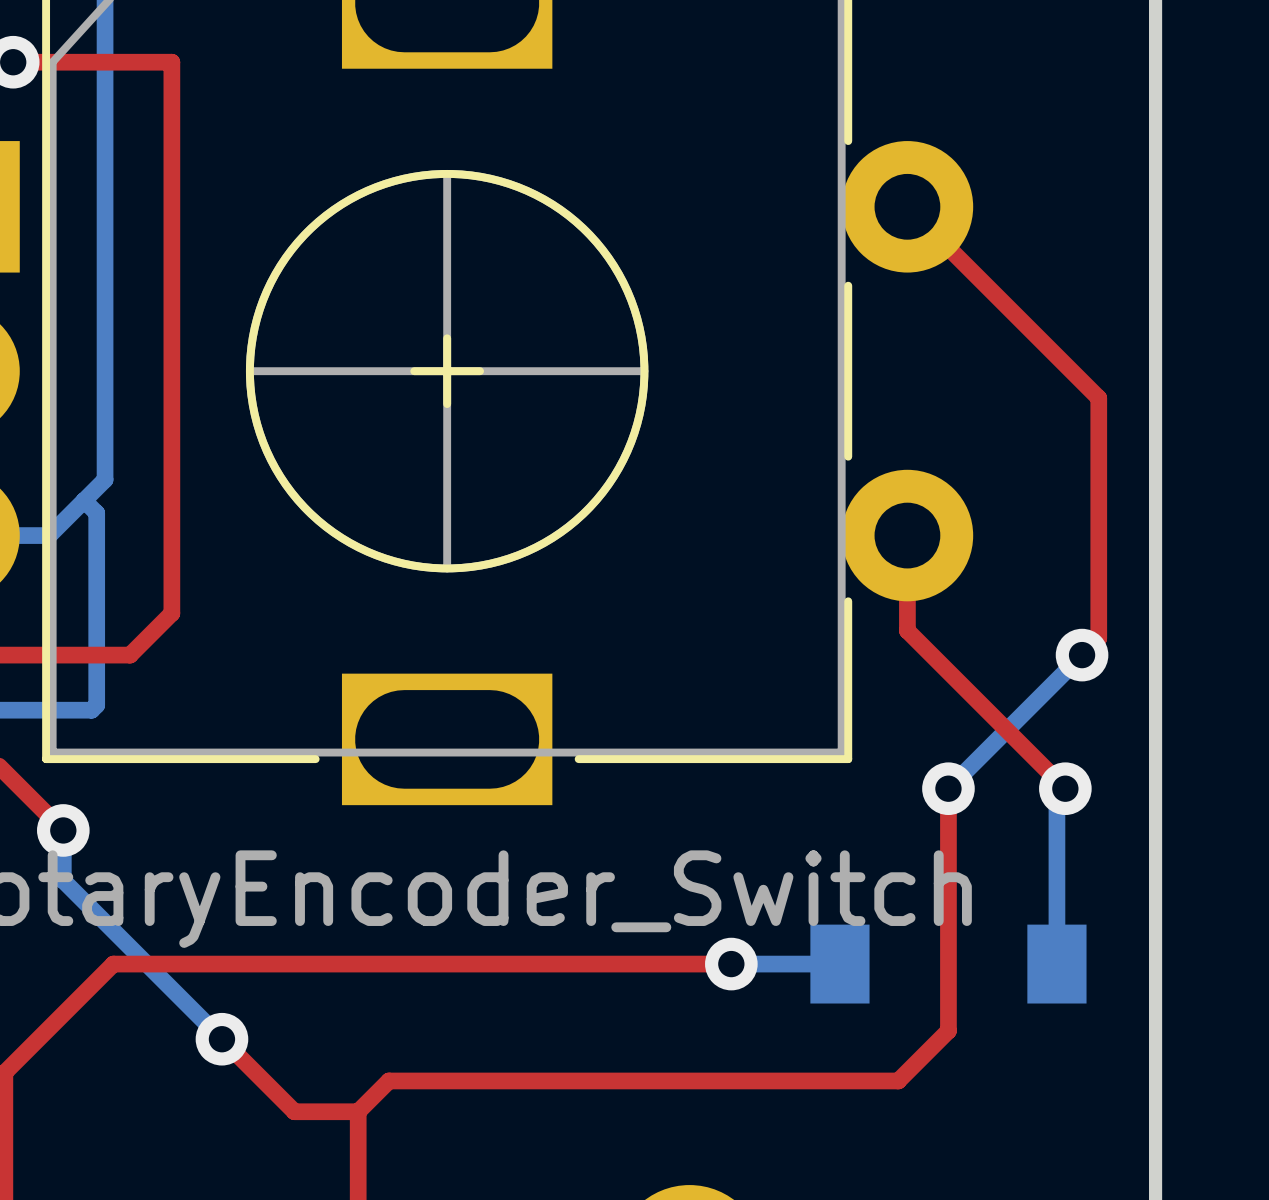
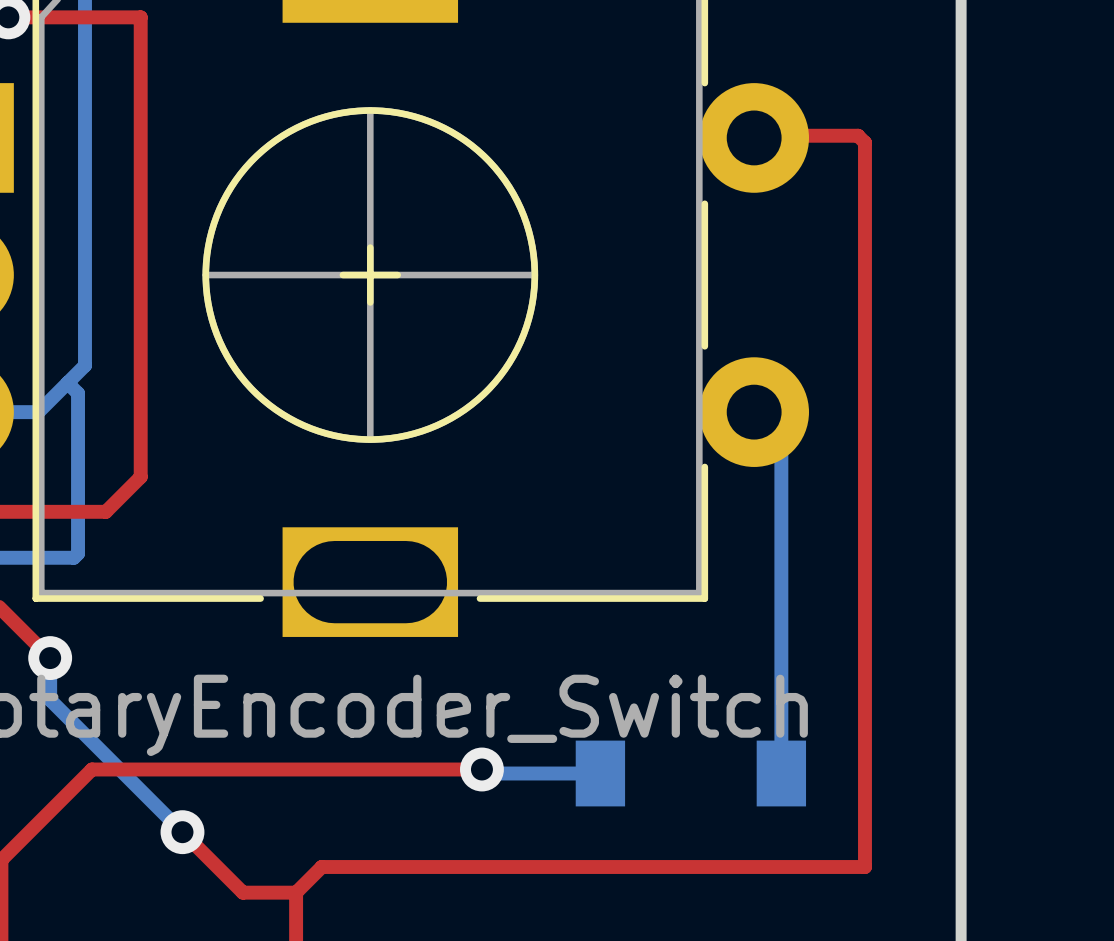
top track: (907, 206) (1098, 398) (1098, 638) (1082, 655) -> (754, 137) (756, 135) (858, 135) (864, 142) (864, 867) (746, 867)
bottom track: none -> (754, 412) (781, 439) (781, 773)
top track: (907, 535) (907, 630) (1065, 788) -> none
bottom track: (1082, 655) (948, 788) -> none
via: (1082, 655) -> none
top track: (948, 788) (948, 1030) (898, 1080) -> none
via: (948, 788) -> none
bottom track: (1065, 788) (1056, 797) (1056, 964) -> none
via: (1065, 788) -> none
bottom track: none -> (481, 769) (485, 773) (600, 773)
top track: (581, 964) (731, 964) -> none
bottom track: (731, 964) (839, 964) -> none
via position: (731, 964) -> (481, 769)
part position: (948, 964) -> (690, 773)

